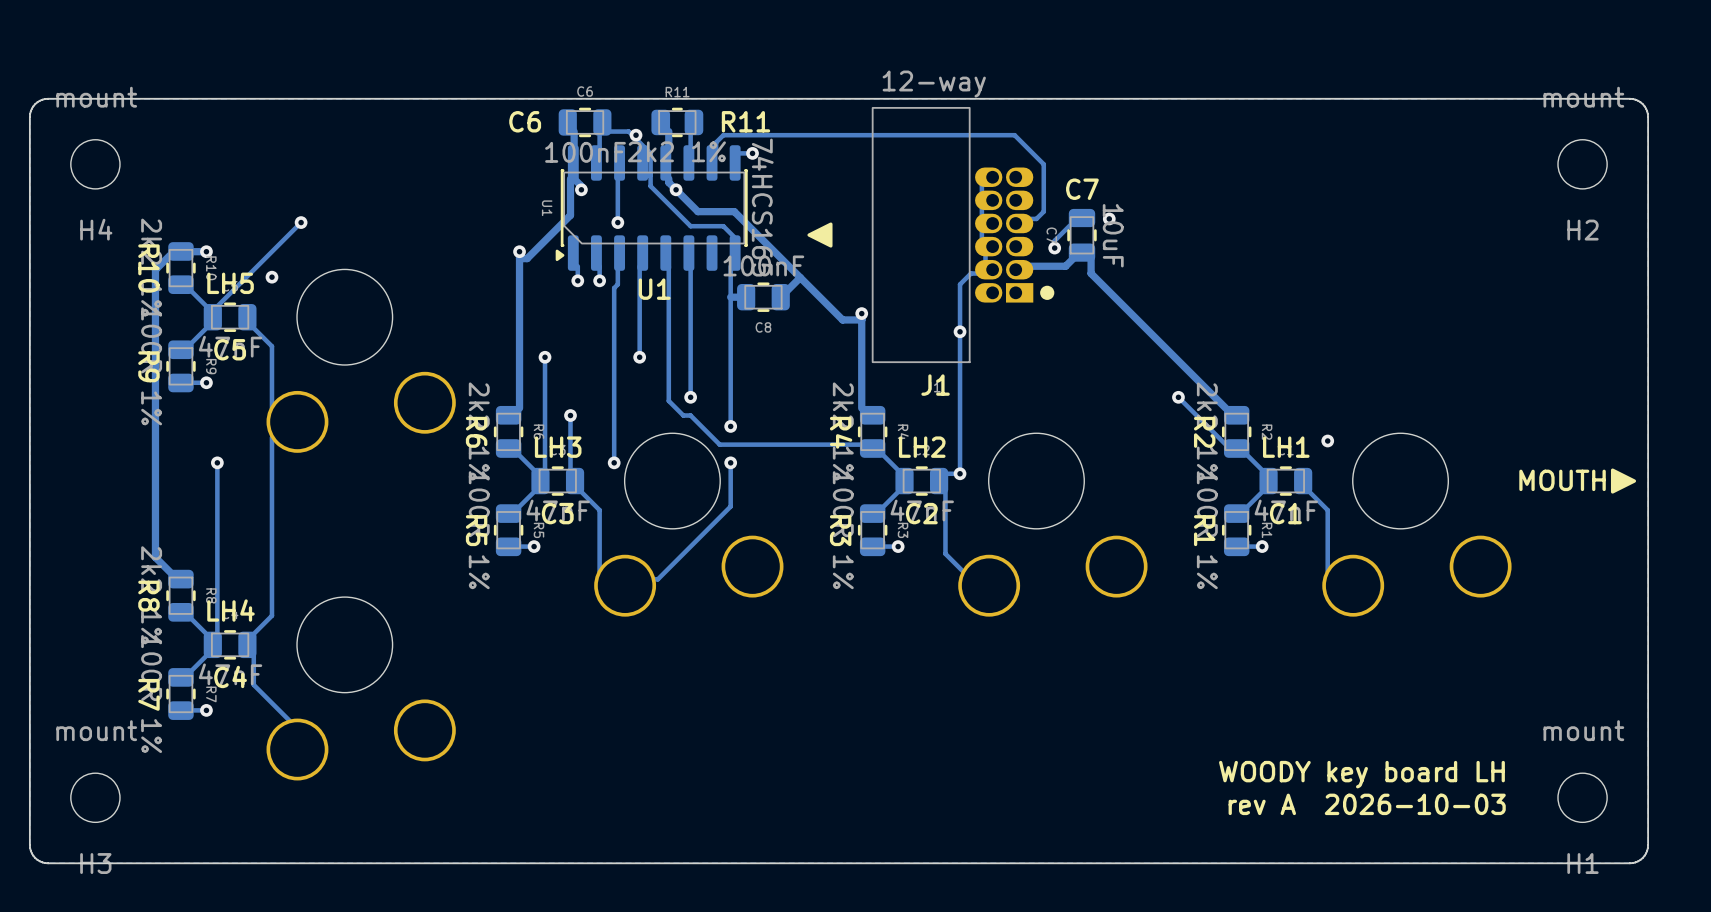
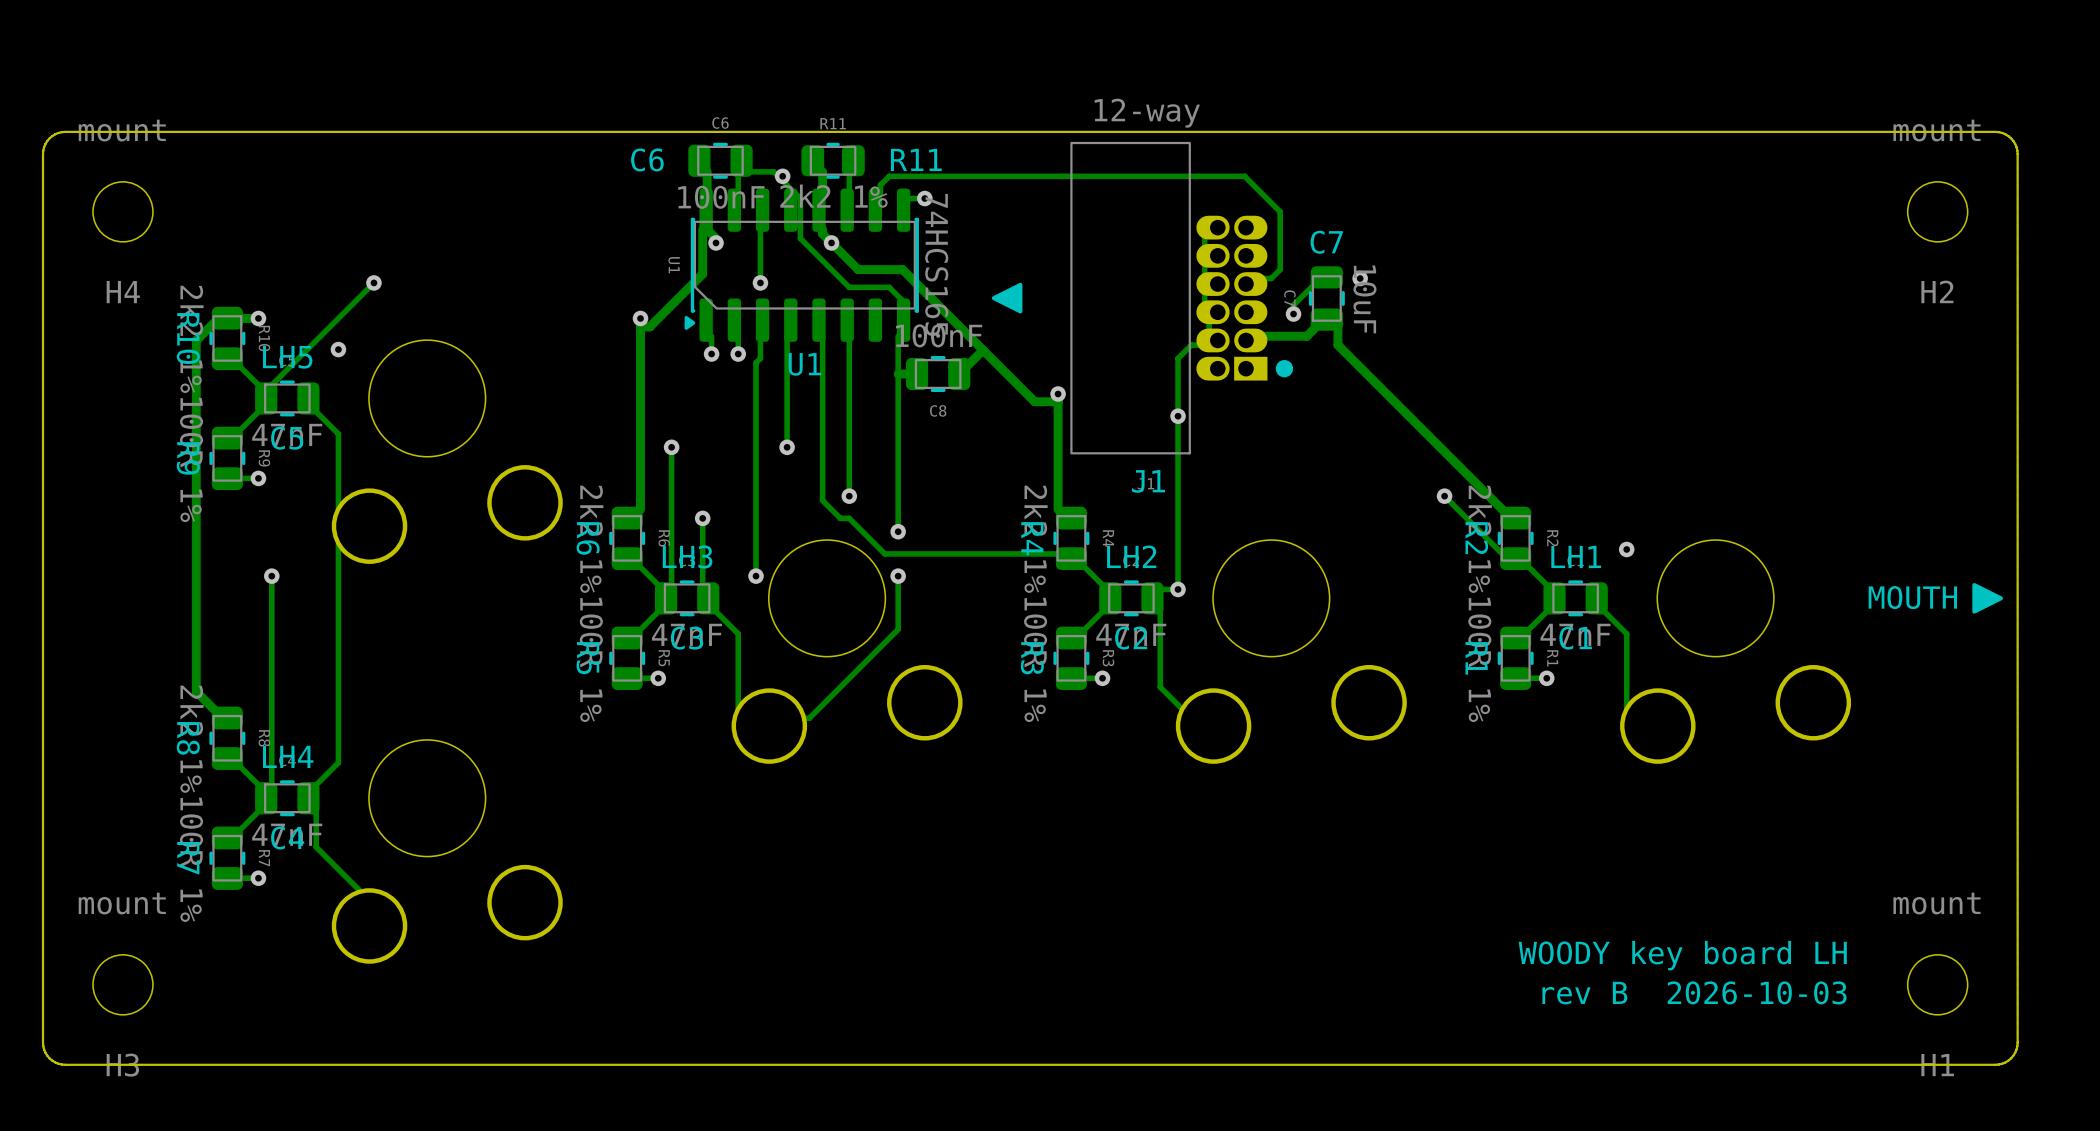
text: rev A 2026-10-03 (1367, 804) -> rev B 2026-10-03 (1694, 992)

